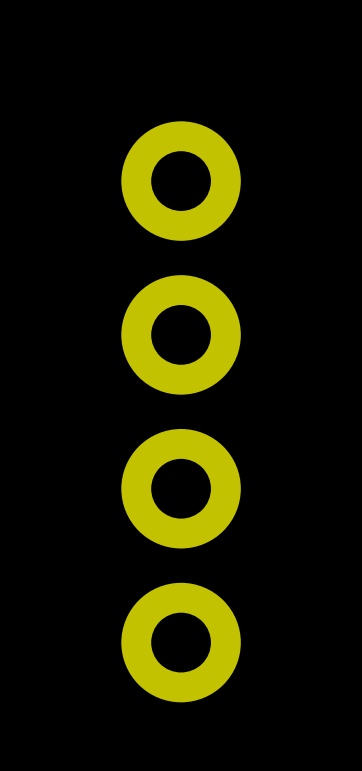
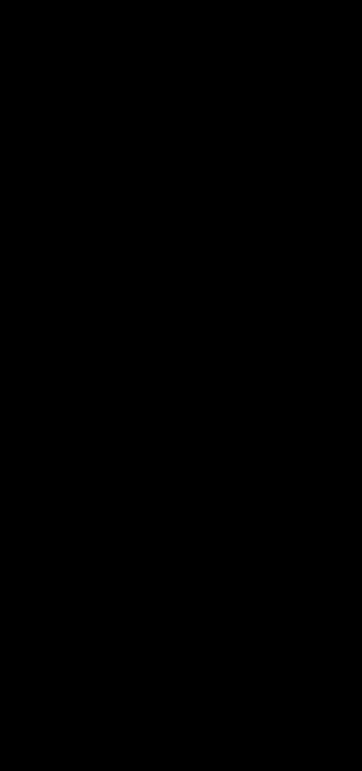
part: (181, 181) -> none
part: (181, 334) -> none
part: (181, 488) -> none
part: (181, 642) -> none

